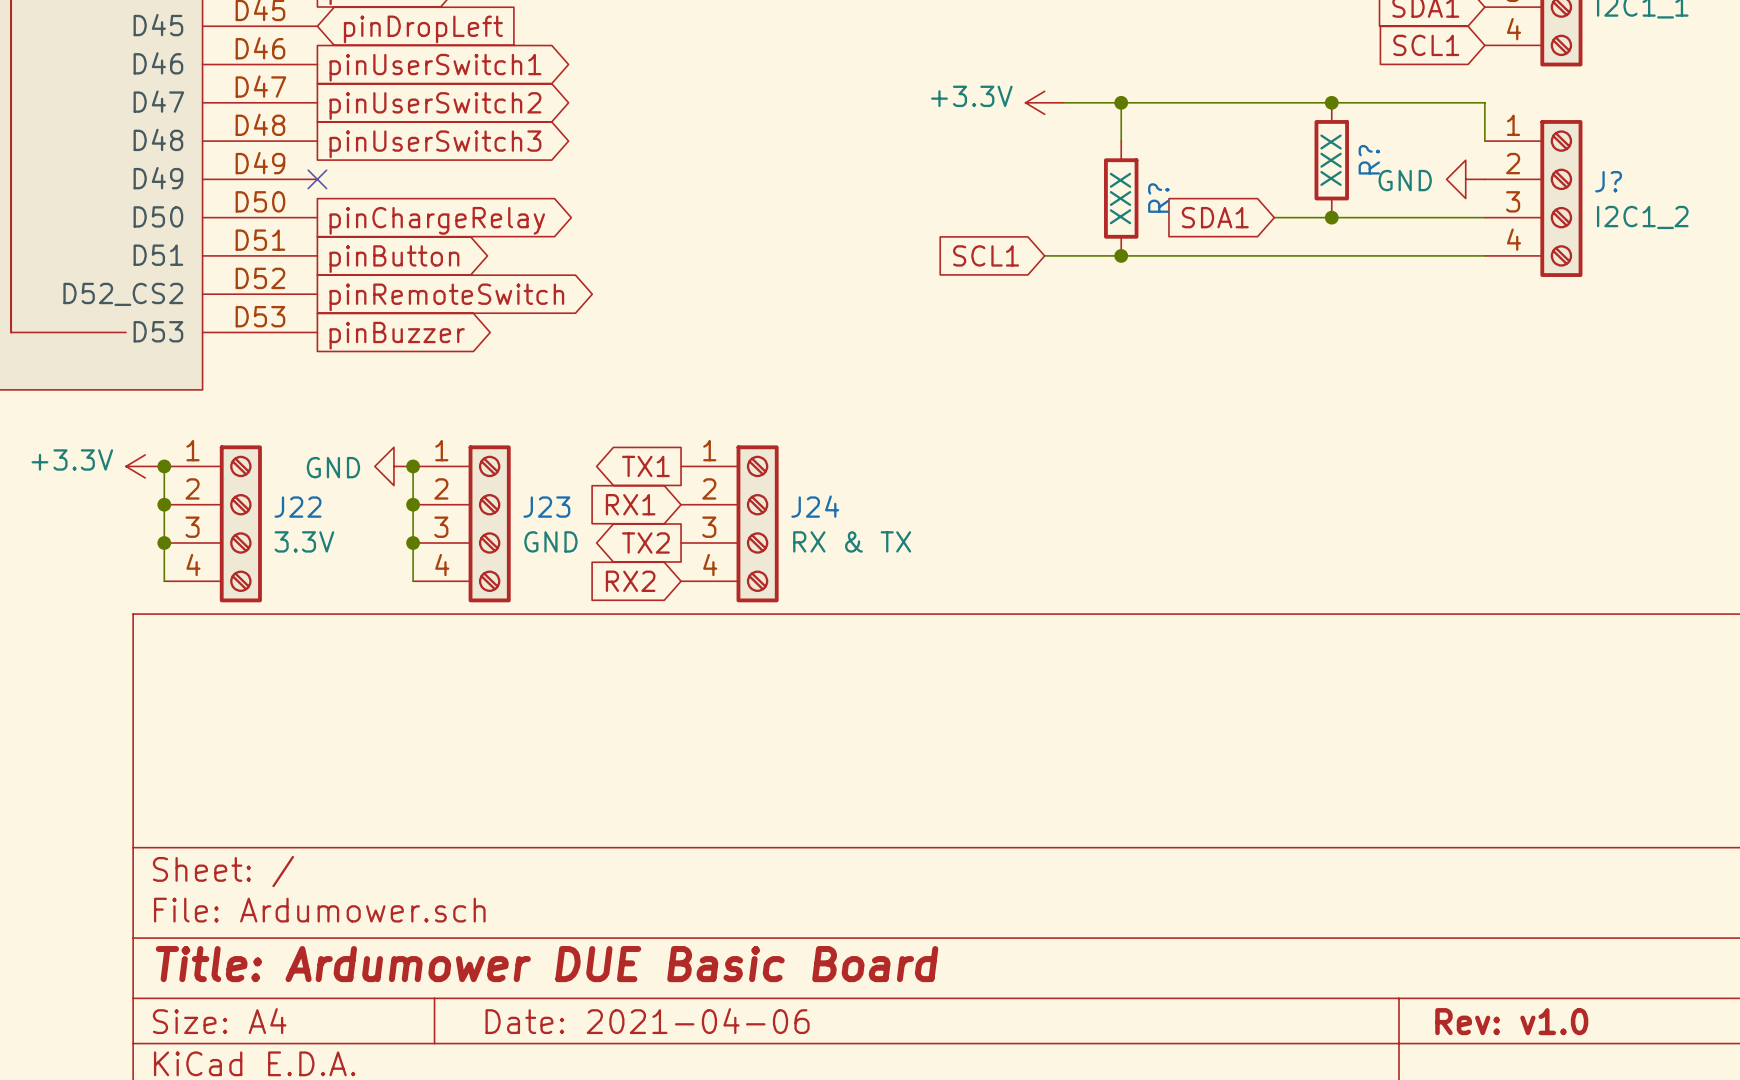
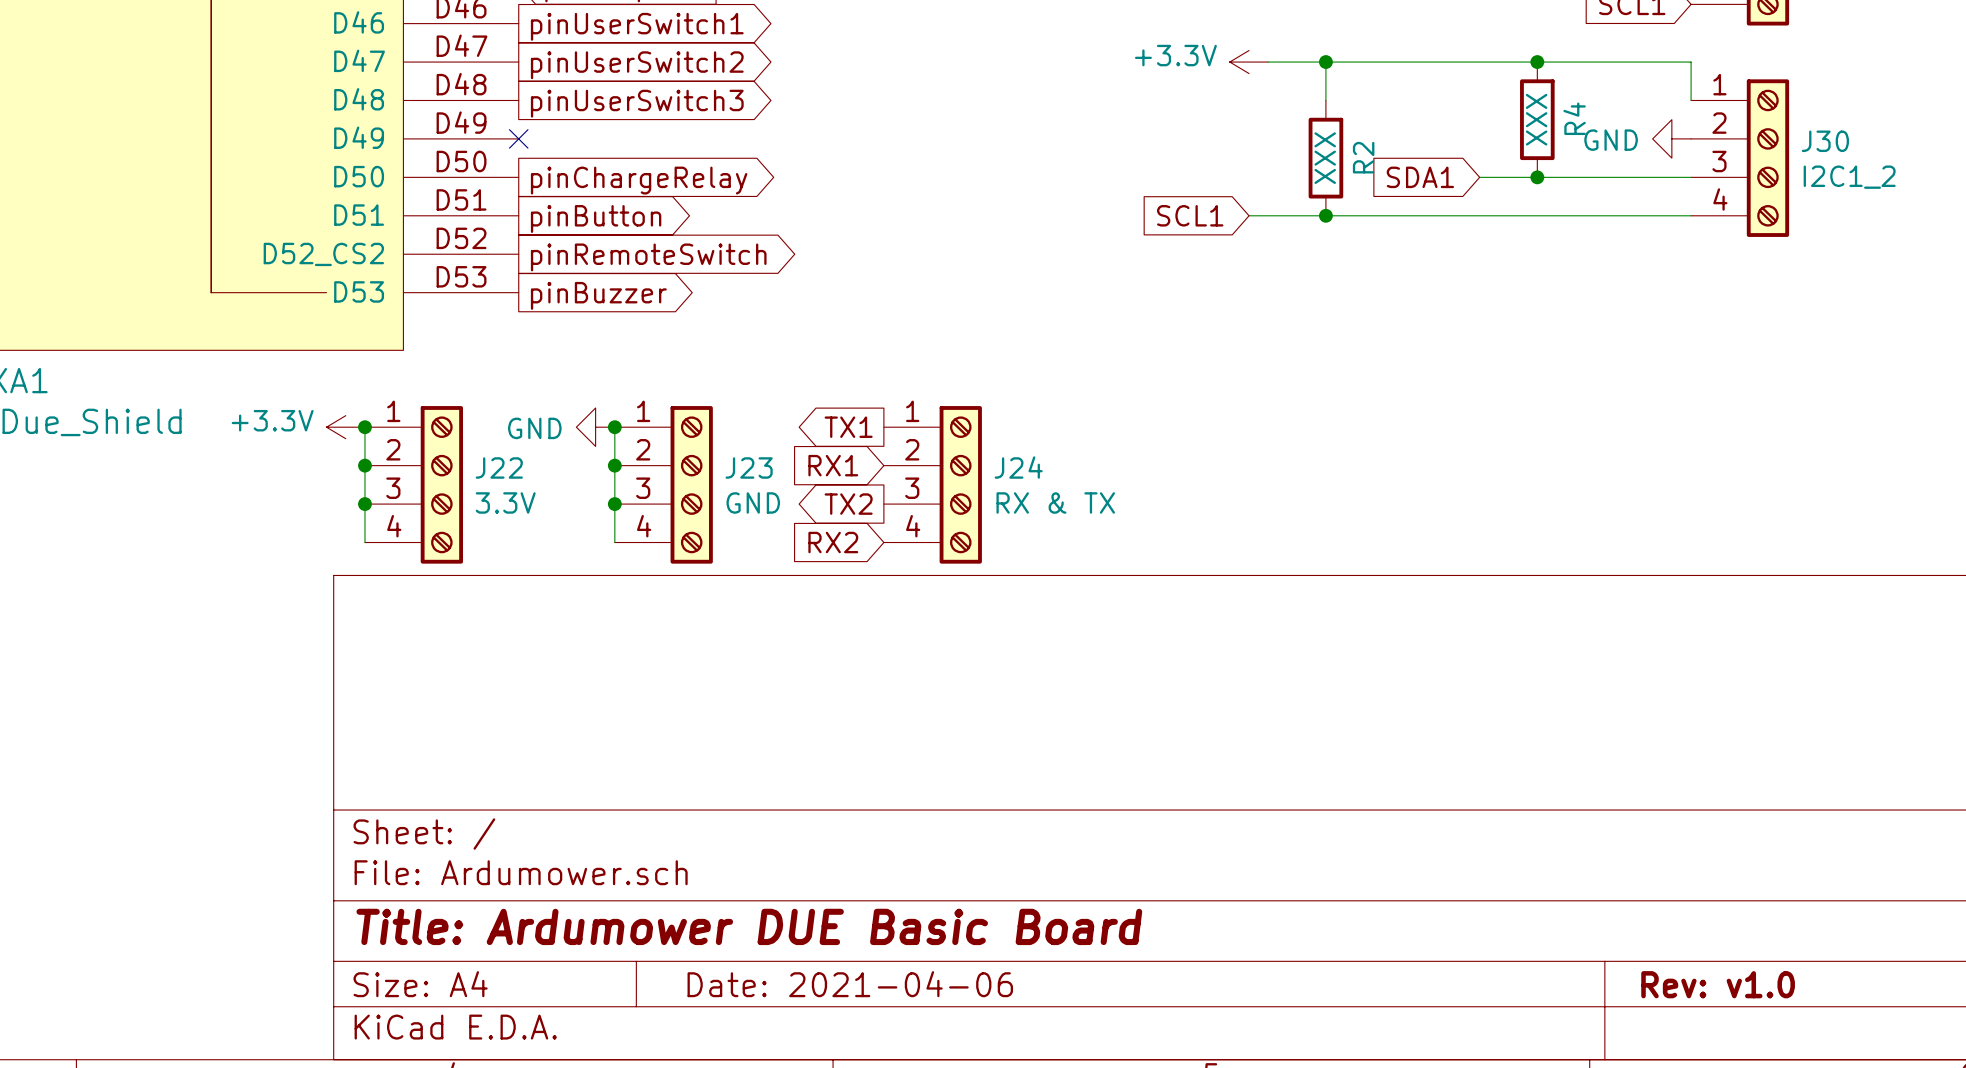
R? name: R? (1369, 159) -> R4 (1574, 118)
J? name: J? (1608, 181) -> J30 (1825, 141)
R? name: R? (1158, 198) -> R2 (1363, 157)

